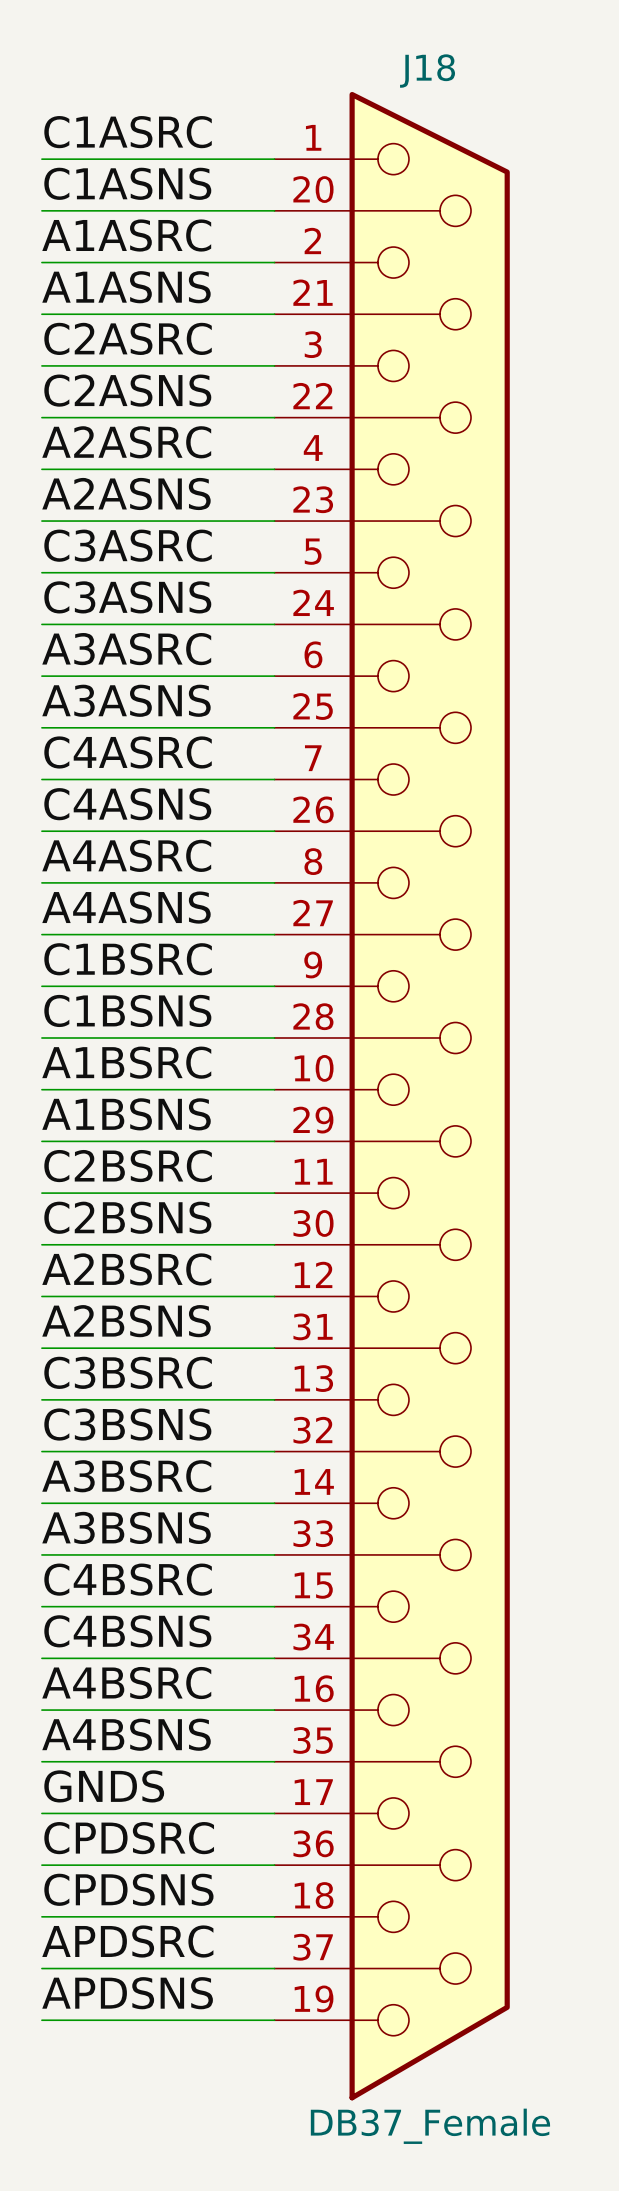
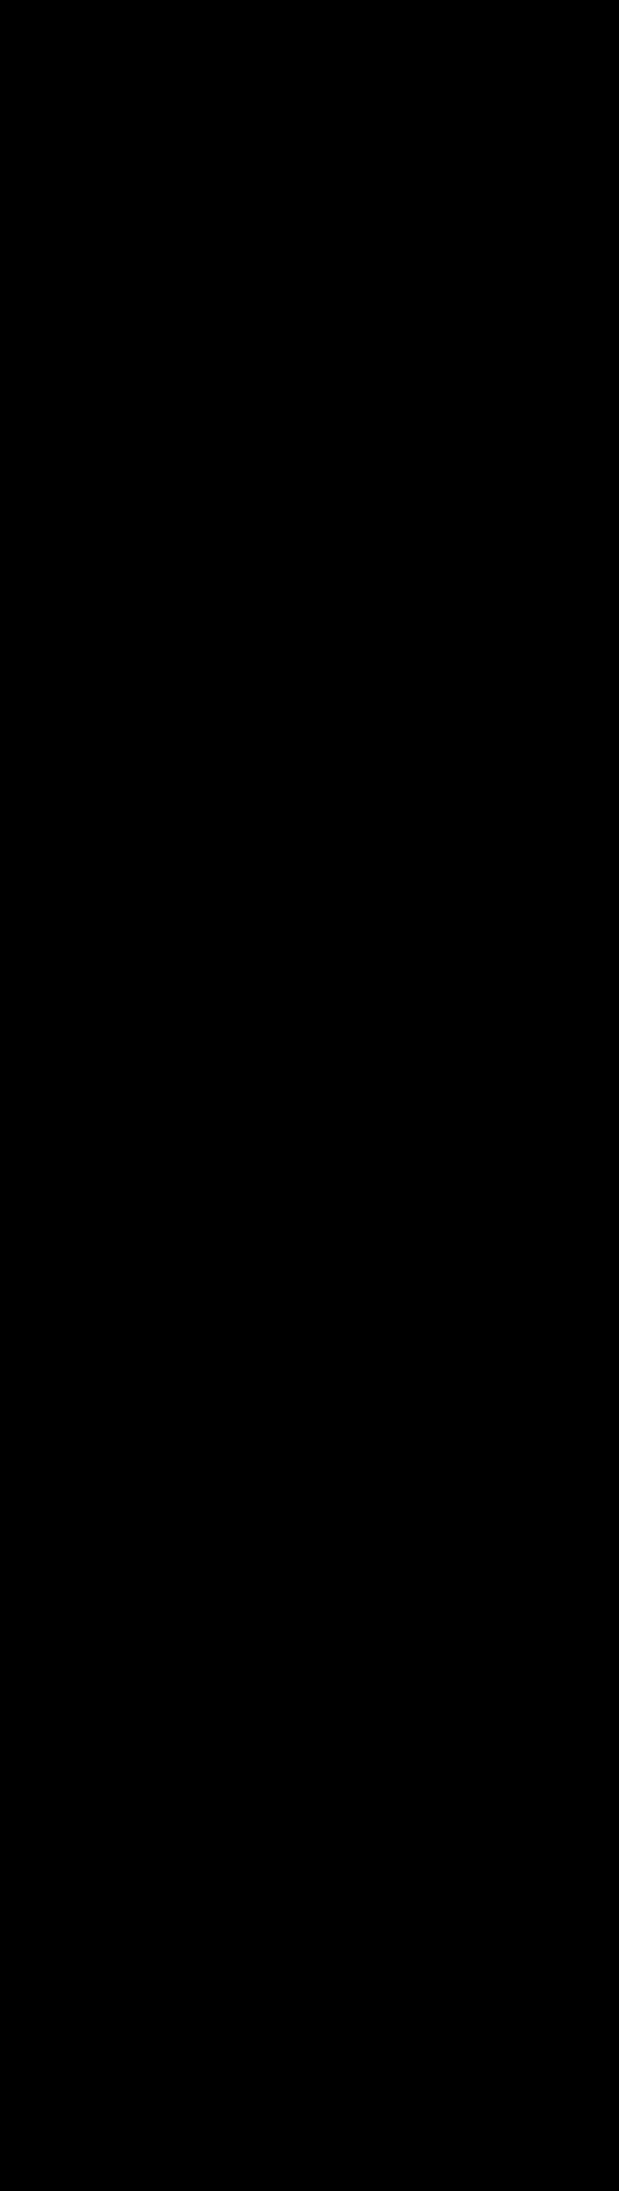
label: C1ASRC (128, 132) -> none
wire: (41, 159) (274, 159) -> none
label: C1ASNS (127, 183) -> none
wire: (41, 210) (274, 210) -> none
label: A1ASRC (126, 235) -> none
wire: (41, 262) (274, 262) -> none
label: A1ASNS (126, 287) -> none
wire: (41, 314) (274, 314) -> none
label: C2ASRC (128, 338) -> none
wire: (41, 365) (274, 365) -> none
label: C2ASNS (127, 390) -> none
wire: (41, 417) (274, 417) -> none
label: A2ASRC (126, 442) -> none
wire: (41, 469) (274, 469) -> none
label: A2ASNS (126, 493) -> none
wire: (41, 521) (274, 521) -> none
label: C3ASRC (128, 545) -> none
wire: (41, 572) (274, 572) -> none
label: C3ASNS (127, 597) -> none
wire: (41, 624) (274, 624) -> none
label: A3ASRC (126, 649) -> none
wire: (41, 676) (274, 676) -> none
label: A3ASNS (126, 700) -> none
wire: (41, 727) (274, 727) -> none
label: C4ASRC (128, 752) -> none
wire: (41, 779) (274, 779) -> none
label: C4ASNS (127, 804) -> none
wire: (41, 831) (274, 831) -> none
label: A4ASRC (126, 855) -> none
wire: (41, 882) (274, 882) -> none
label: A4ASNS (126, 907) -> none
wire: (41, 934) (274, 934) -> none
label: C1BSRC (128, 959) -> none
wire: (41, 986) (274, 986) -> none
label: C1BSNS (127, 1010) -> none
wire: (41, 1038) (274, 1038) -> none
label: A1BSRC (126, 1062) -> none
wire: (41, 1089) (274, 1089) -> none
J18: DB37_Female (392, 1096) -> none
label: A1BSNS (126, 1114) -> none
wire: (41, 1141) (274, 1141) -> none
label: C2BSRC (128, 1166) -> none
wire: (41, 1193) (274, 1193) -> none
label: C2BSNS (127, 1217) -> none
wire: (41, 1244) (274, 1244) -> none
label: A2BSRC (126, 1269) -> none
wire: (41, 1296) (274, 1296) -> none
label: A2BSNS (126, 1321) -> none
wire: (41, 1348) (274, 1348) -> none
label: C3BSRC (128, 1372) -> none
wire: (41, 1399) (274, 1399) -> none
label: C3BSNS (127, 1424) -> none
wire: (41, 1451) (274, 1451) -> none
label: A3BSRC (126, 1476) -> none
wire: (41, 1503) (274, 1503) -> none
label: A3BSNS (126, 1527) -> none
wire: (41, 1554) (274, 1554) -> none
label: C4BSRC (128, 1579) -> none
wire: (41, 1606) (274, 1606) -> none
label: C4BSNS (127, 1631) -> none
wire: (41, 1658) (274, 1658) -> none
label: A4BSRC (126, 1683) -> none
wire: (41, 1710) (274, 1710) -> none
label: A4BSNS (126, 1734) -> none
wire: (41, 1761) (274, 1761) -> none
label: GNDS (104, 1786) -> none
wire: (41, 1813) (274, 1813) -> none
label: CPDSRC (129, 1838) -> none
wire: (41, 1865) (274, 1865) -> none
label: CPDSNS (128, 1889) -> none
wire: (41, 1916) (274, 1916) -> none
label: APDSRC (127, 1941) -> none
wire: (41, 1968) (274, 1968) -> none
label: APDSNS (127, 1993) -> none
wire: (41, 2020) (274, 2020) -> none

